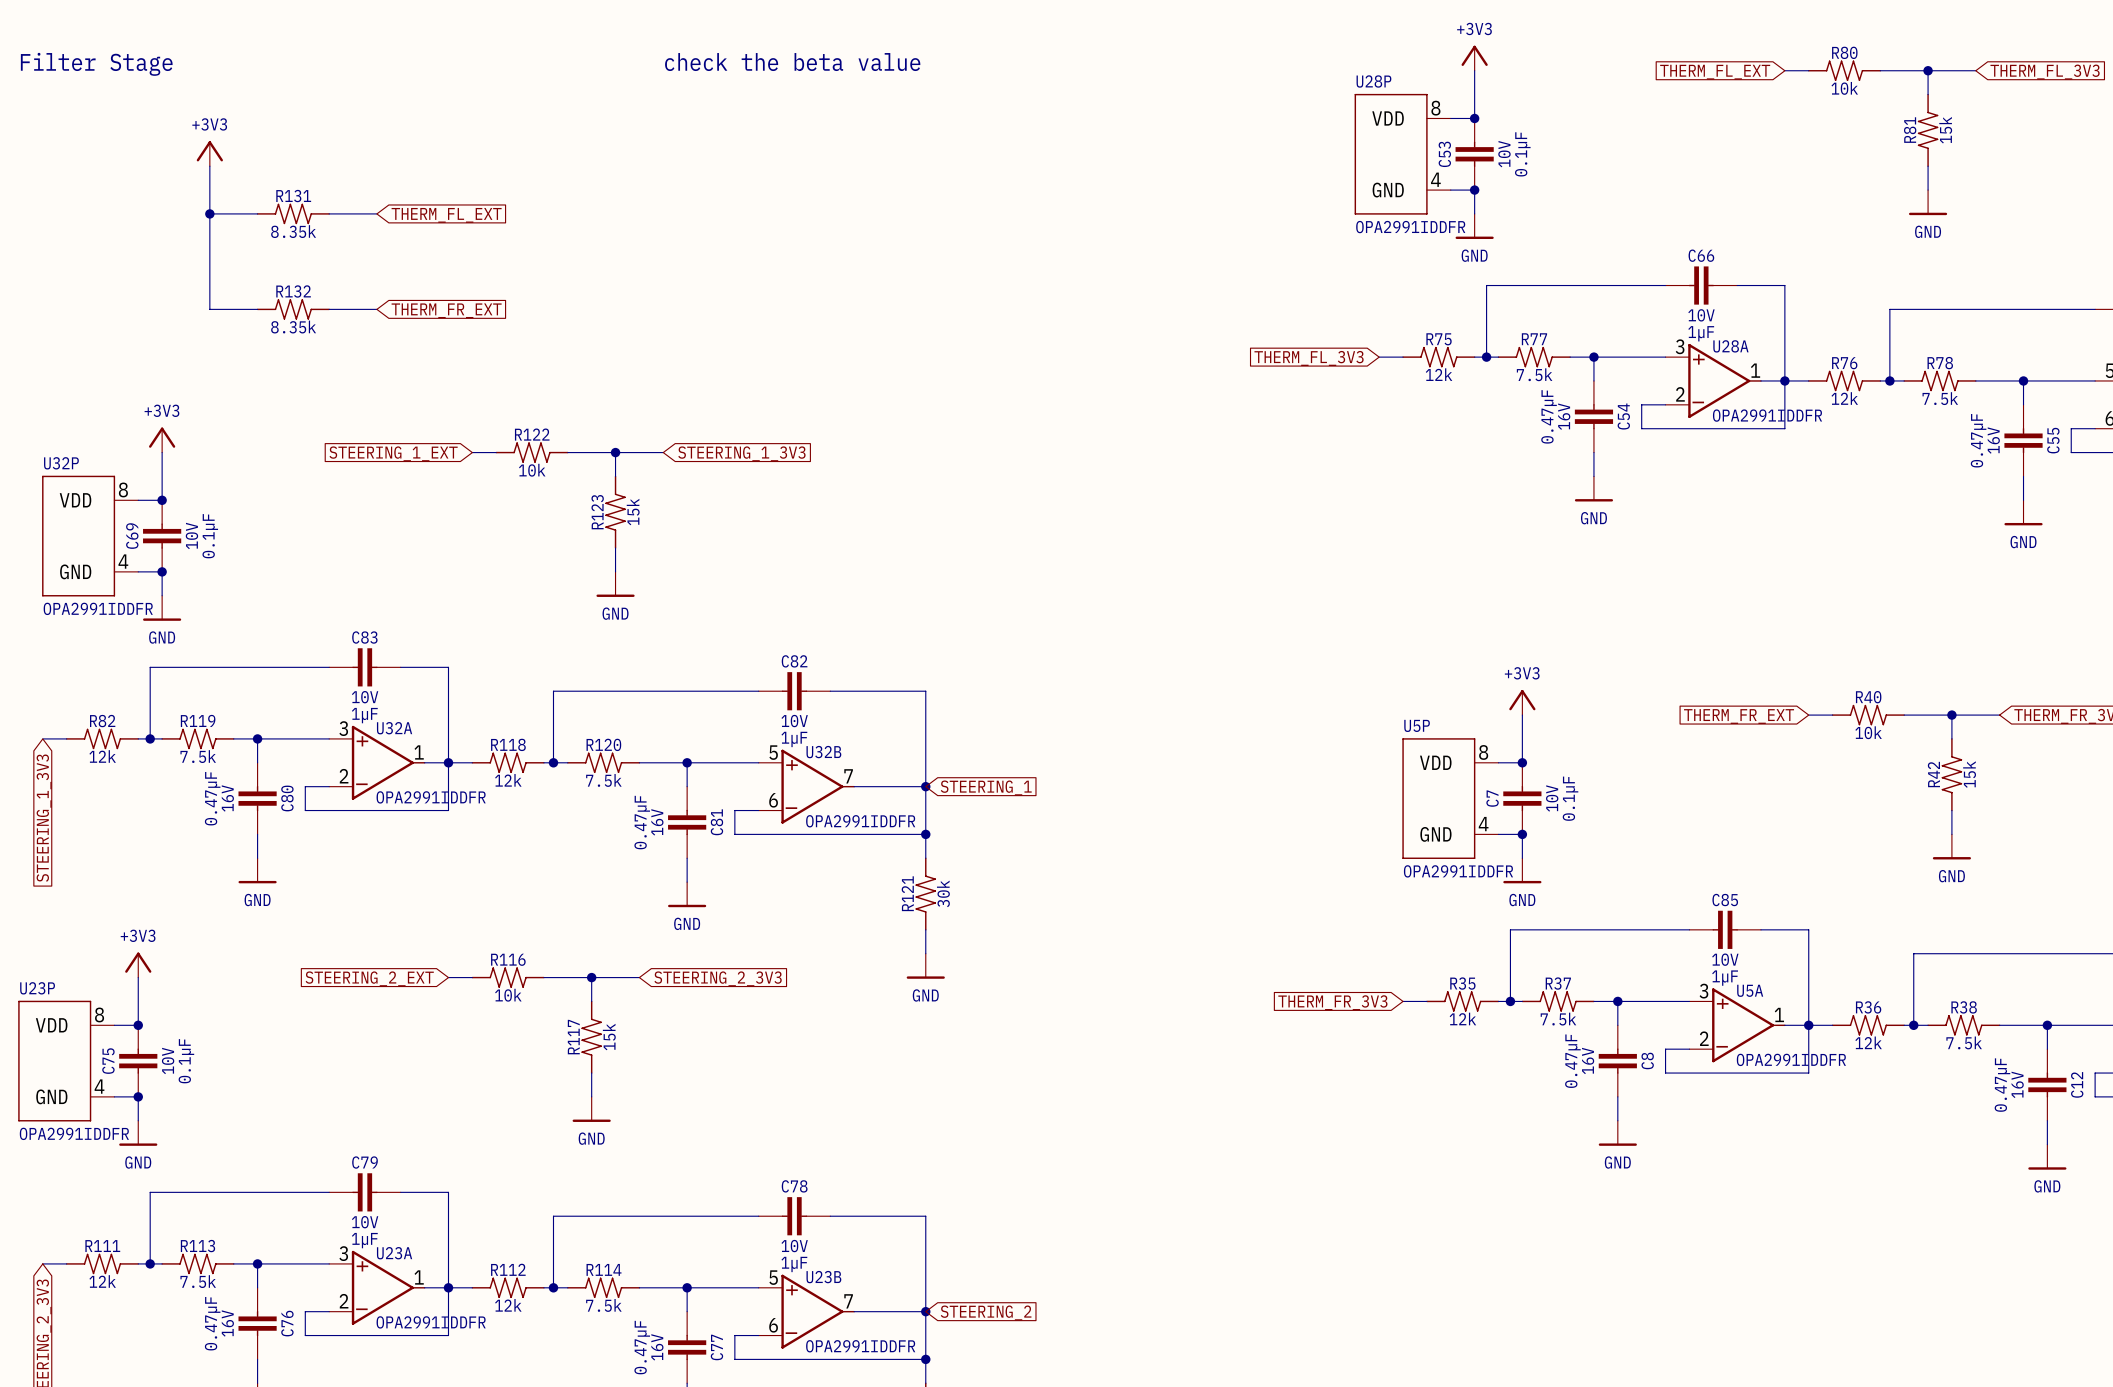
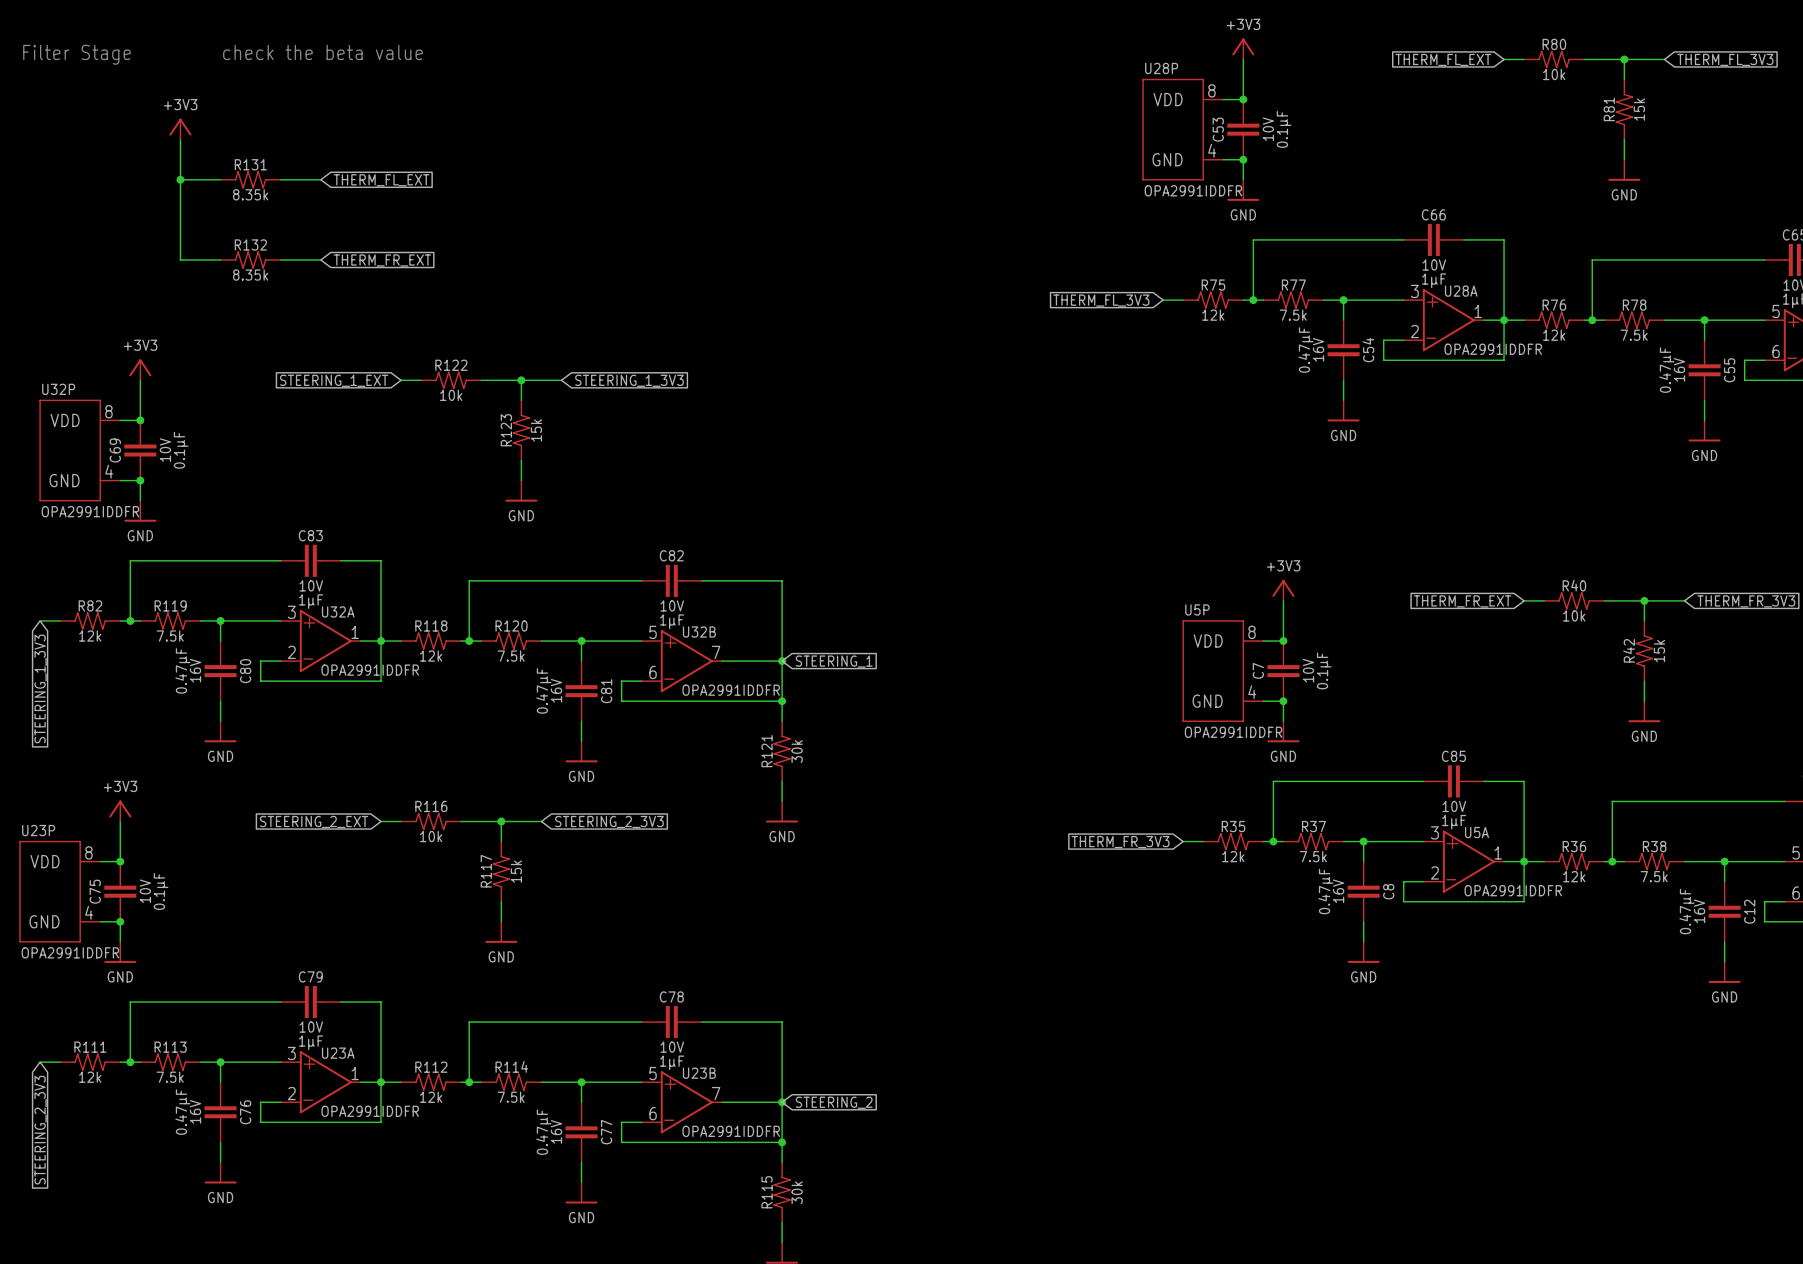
text: none -> check the beta value (322, 52)
text: check the beta value (792, 62) -> none

